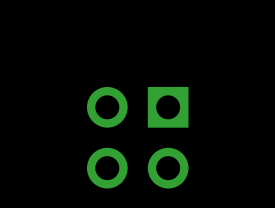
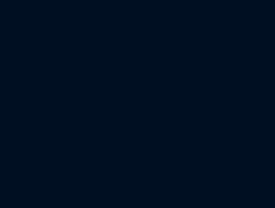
part: (137, 137) -> none

